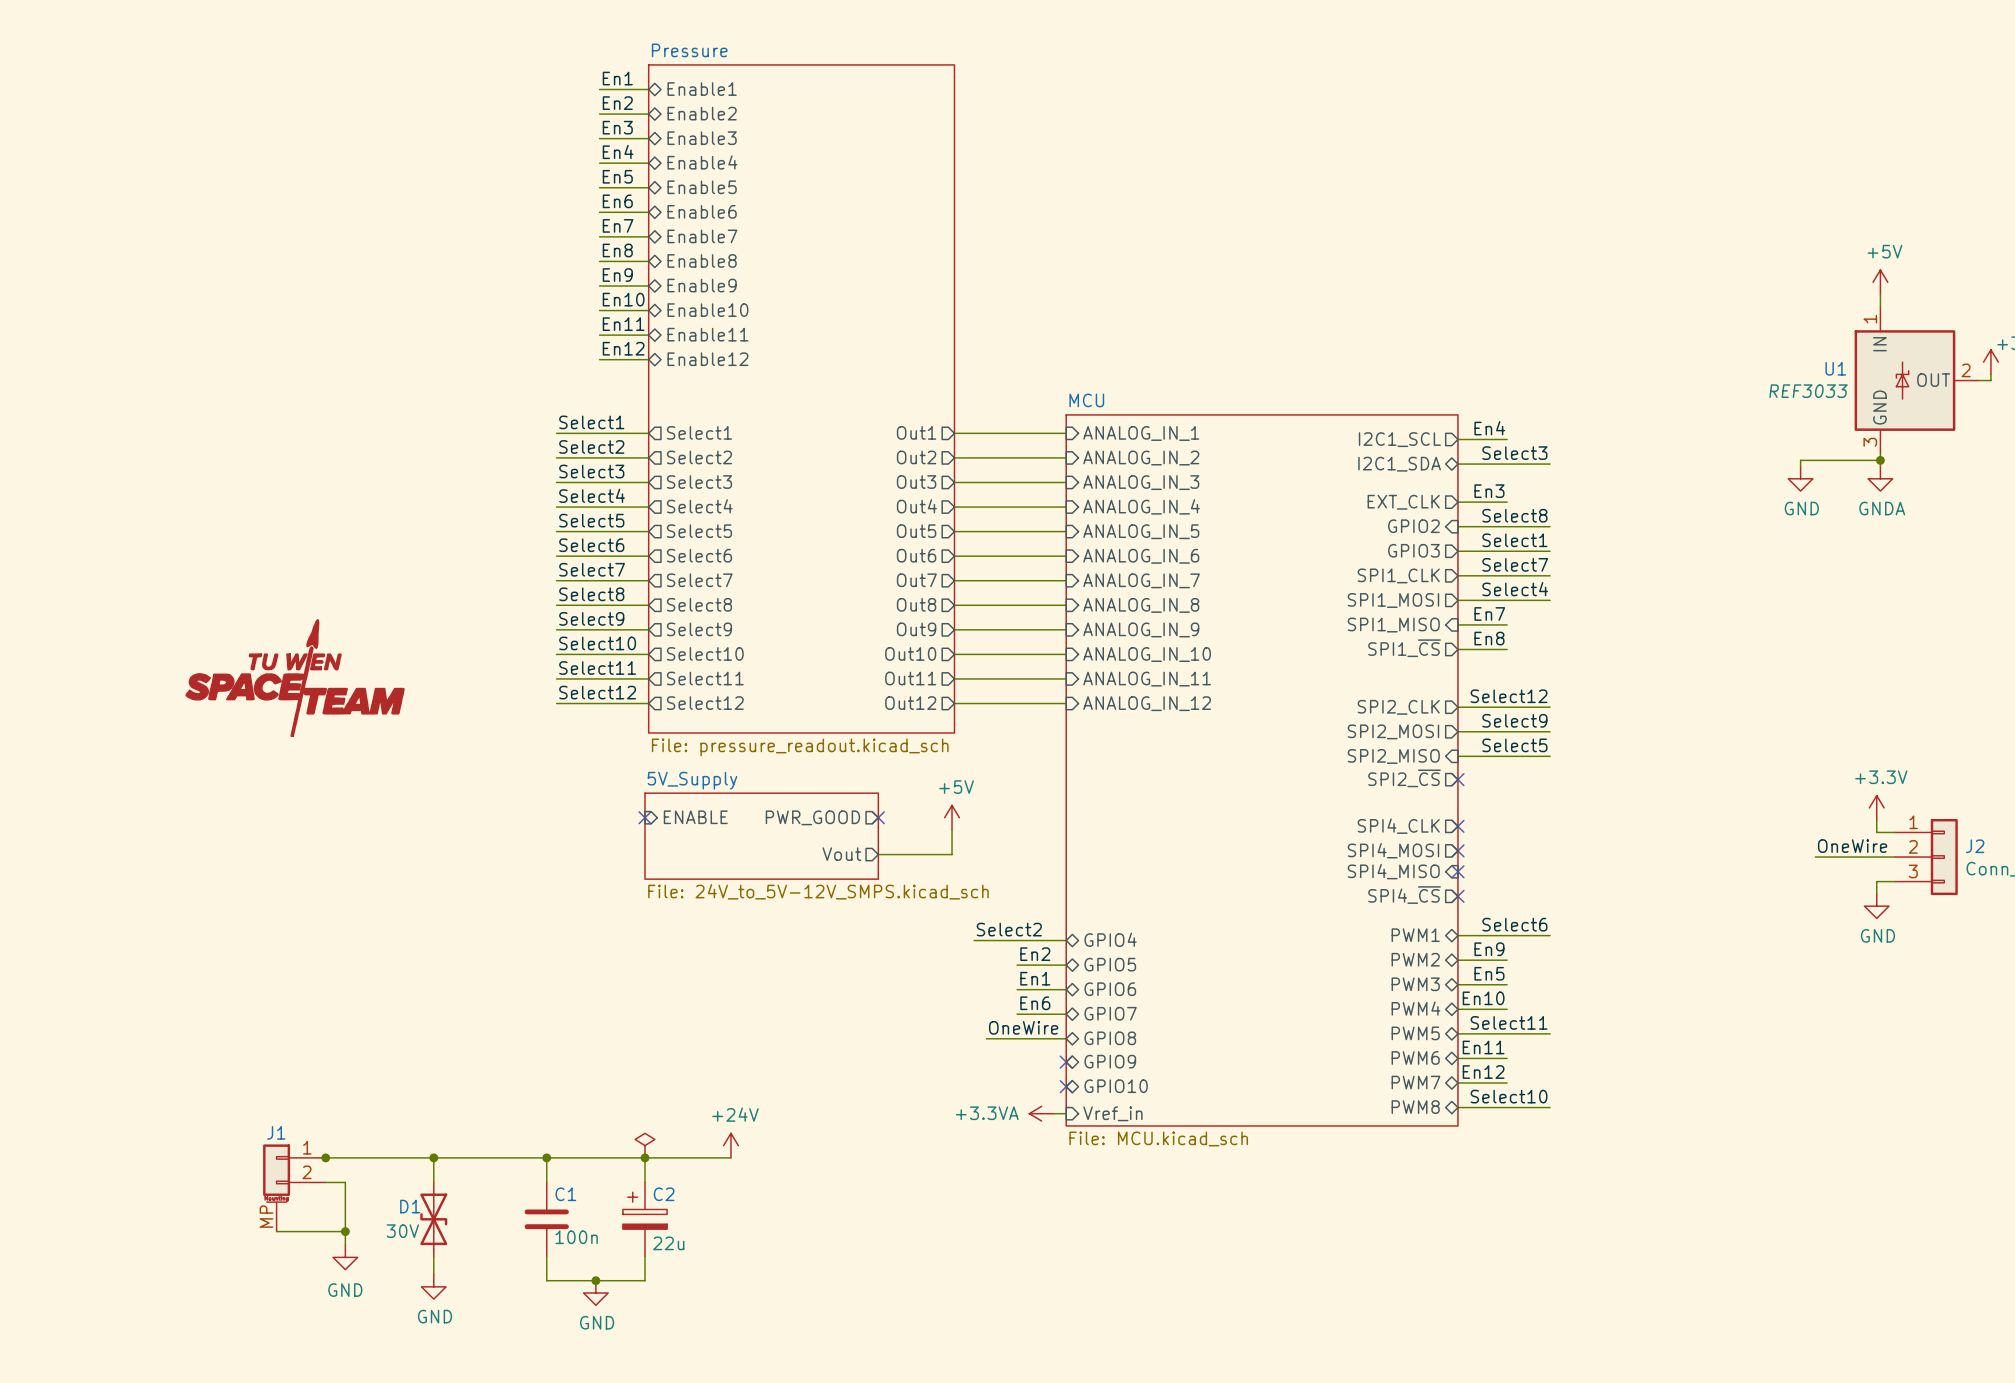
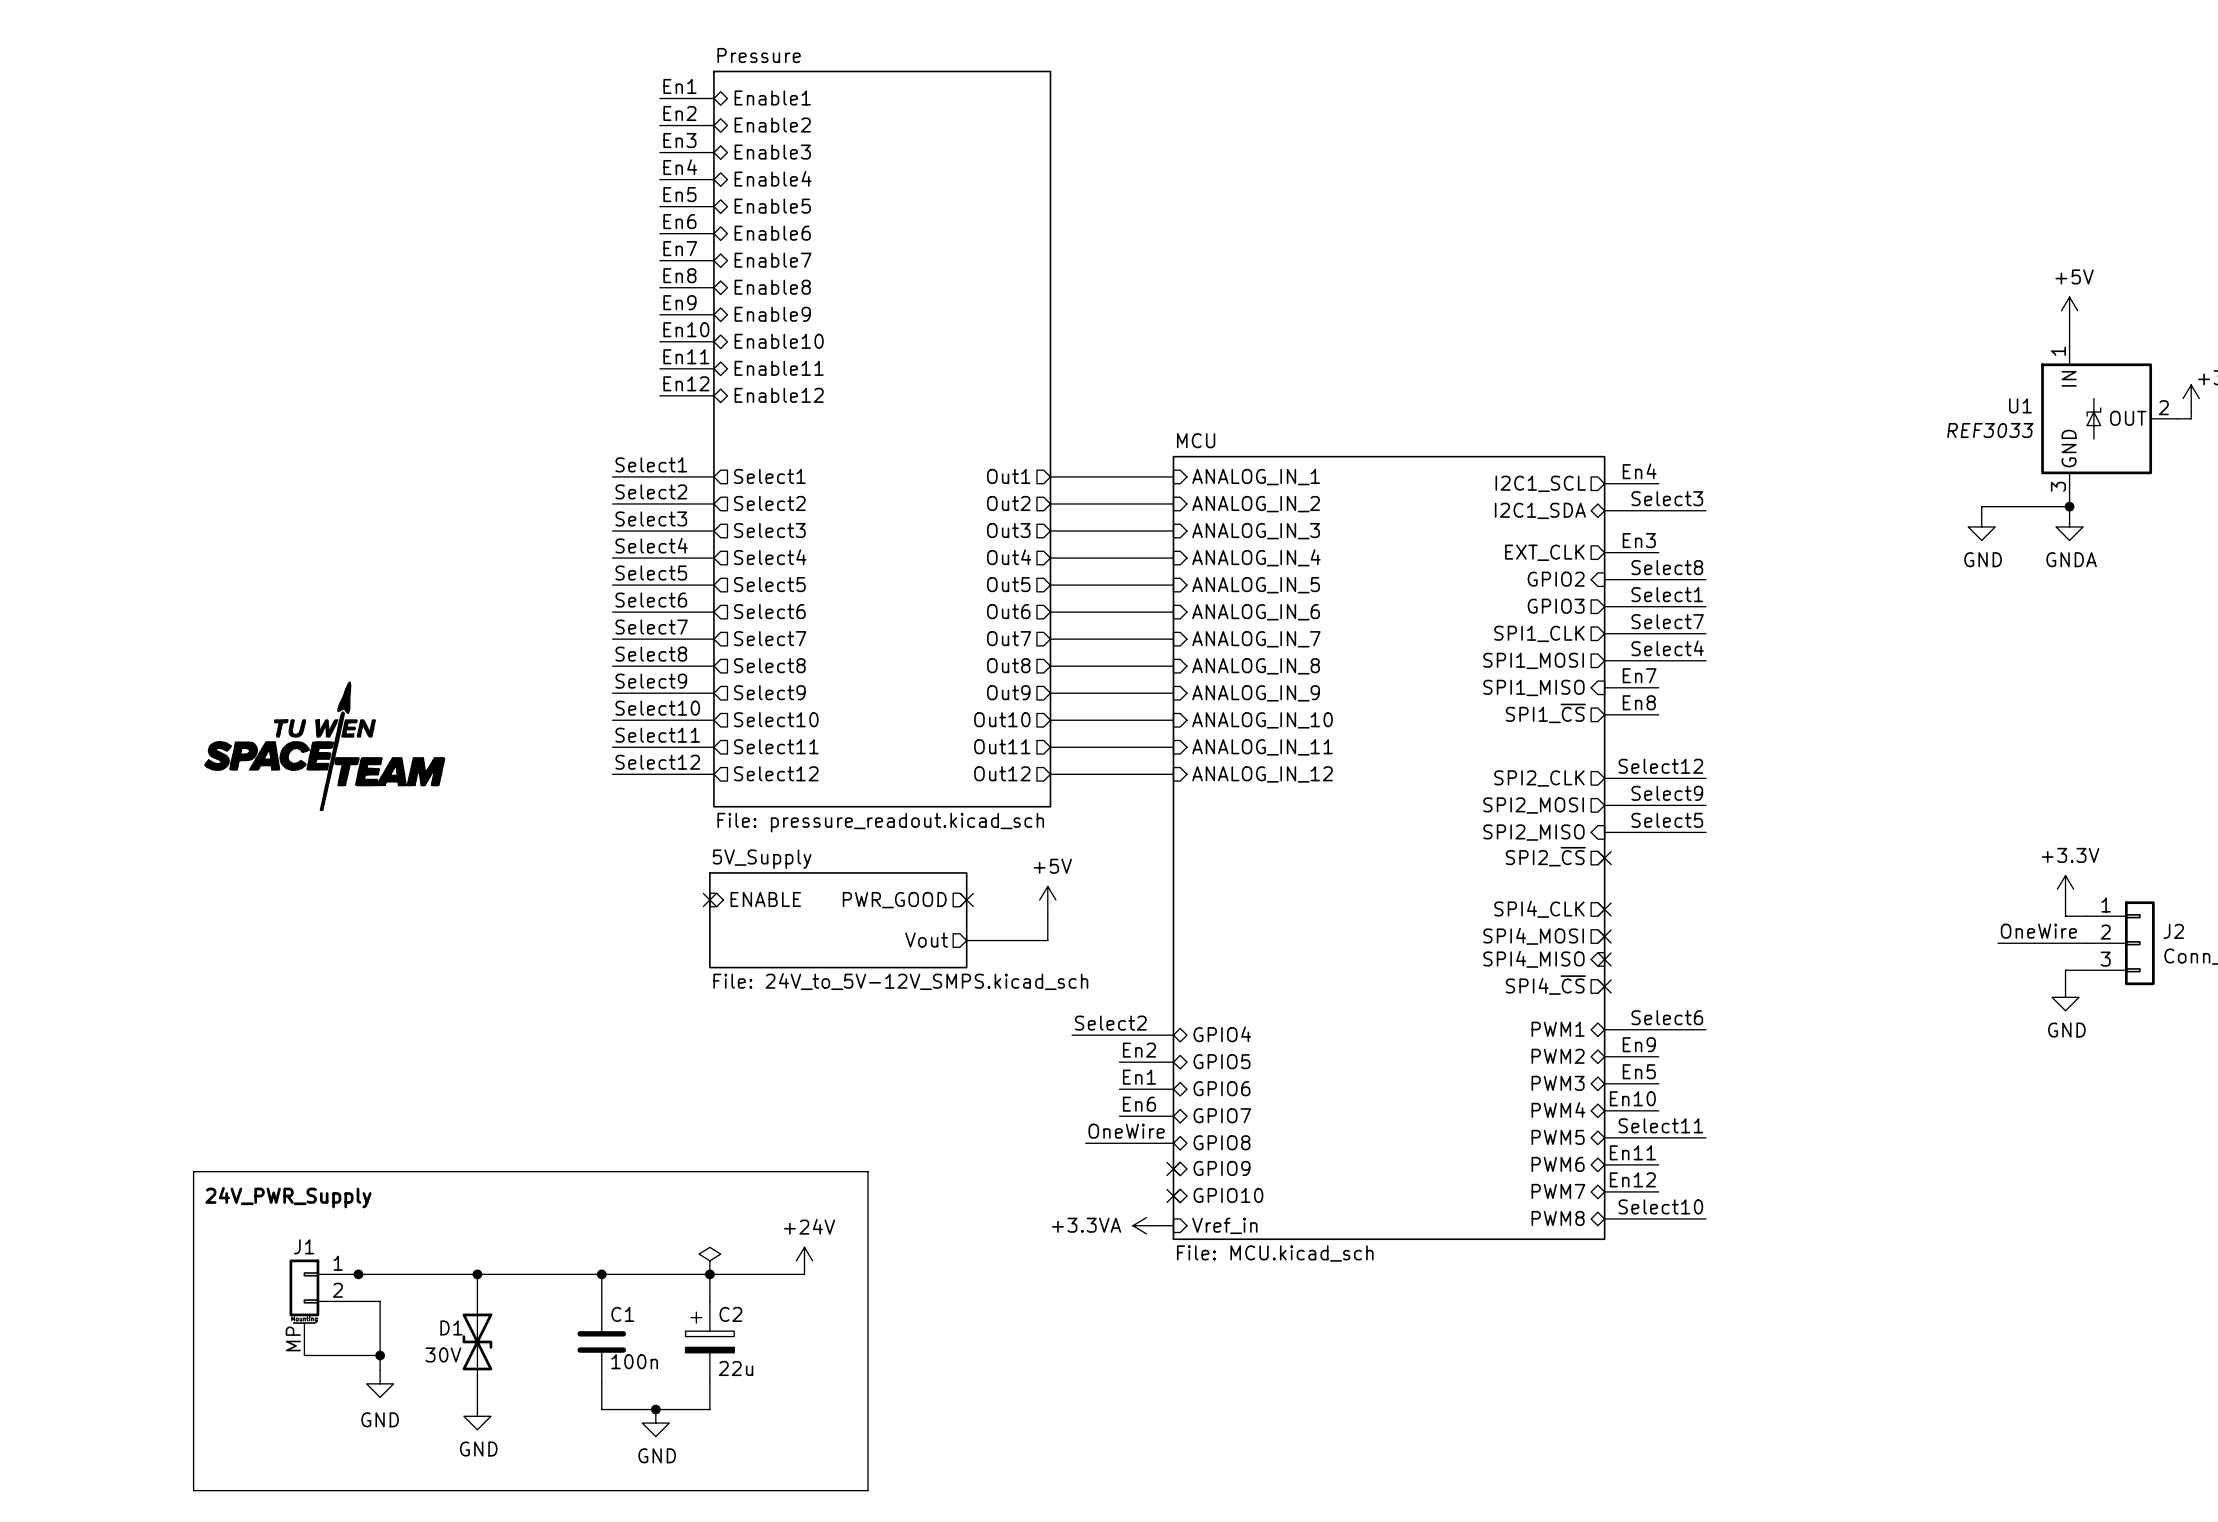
line: none -> (193, 1171) (868, 1171) (868, 1490) (193, 1490) (193, 1171)
text: none -> 24V_PWR_Supply (288, 1197)

